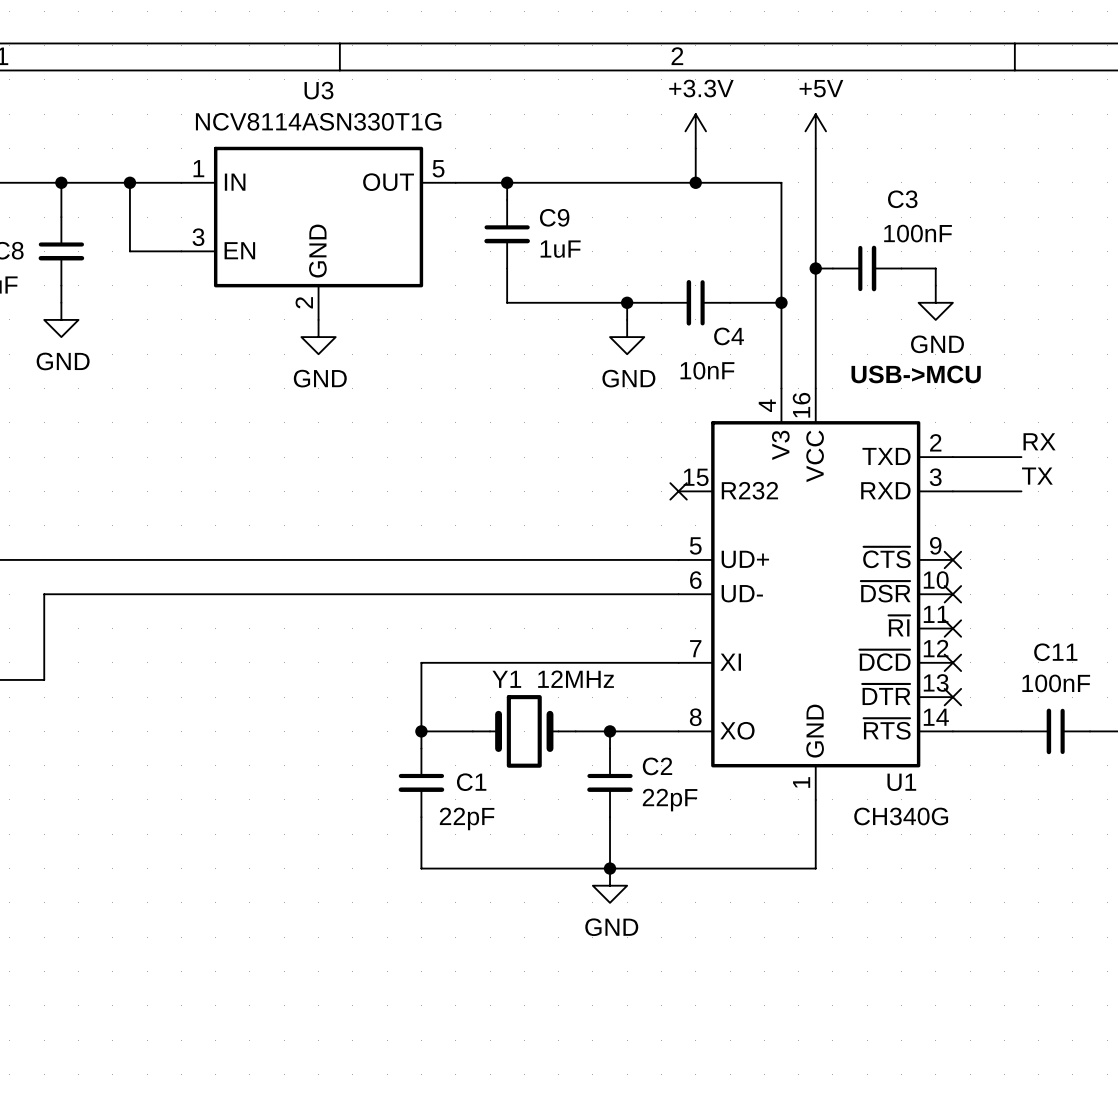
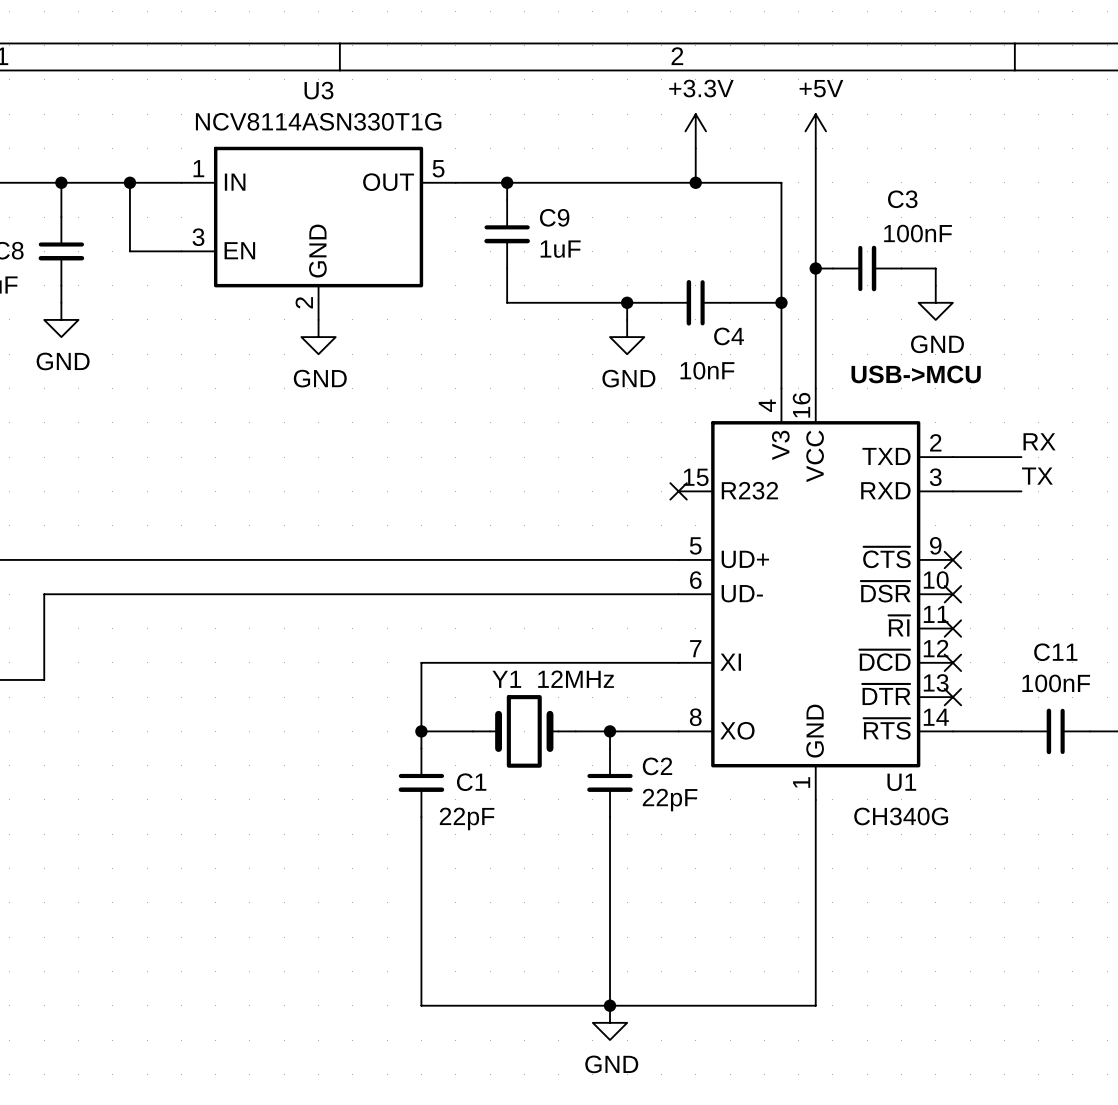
wire: (421, 868) (815, 868) -> (421, 868) (421, 1005) (815, 1005) (815, 868)
wire: none -> (610, 868) (610, 1005)
junction: (610, 868) -> none
power symbol position: GND (610, 885) -> GND (610, 1022)
junction: none -> (610, 1005)

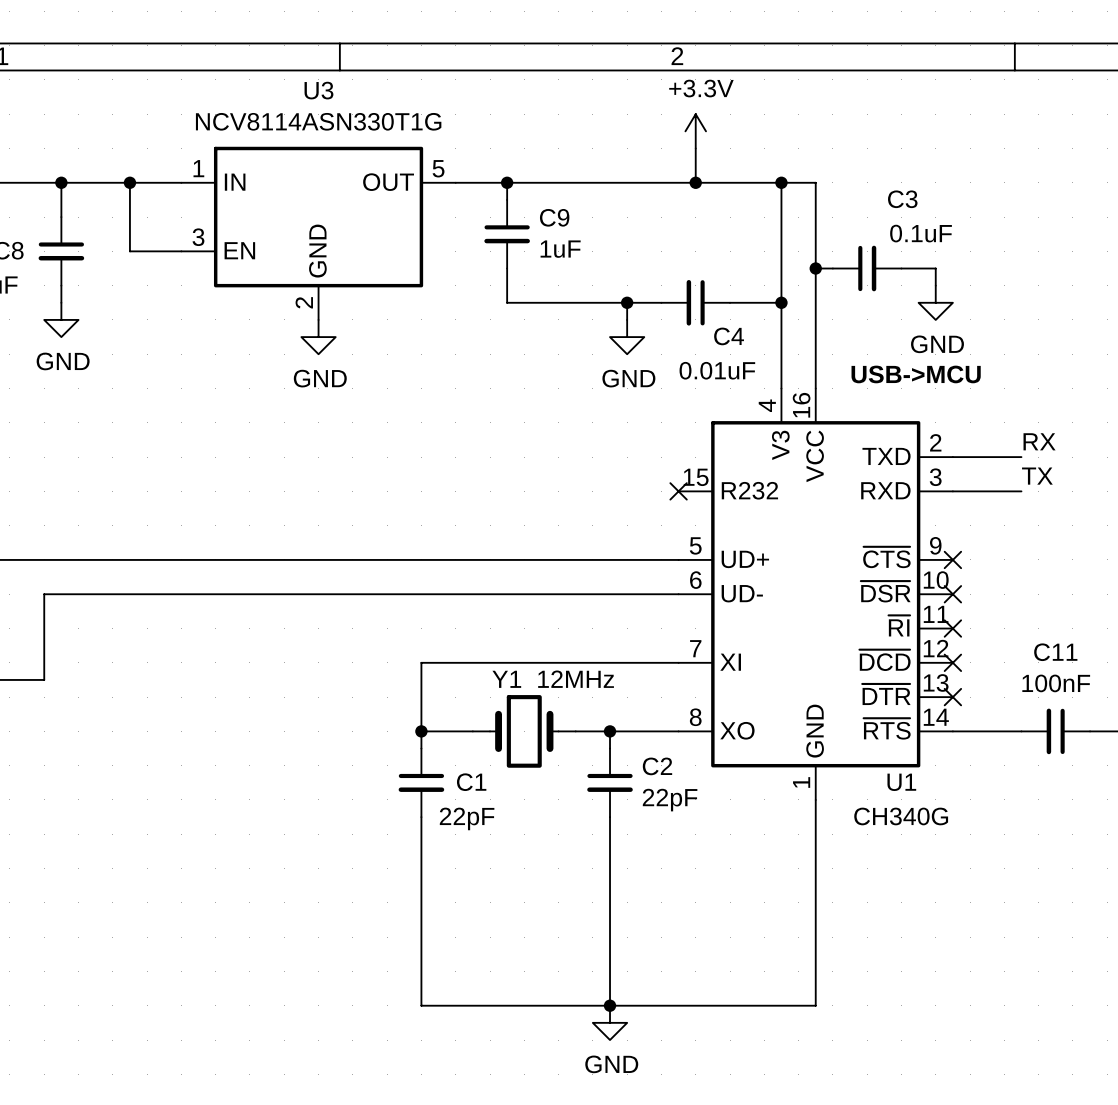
power symbol: +5V (815, 131) -> none
wire: (815, 148) (815, 182) -> (781, 182) (815, 182)
junction: none -> (781, 182)
C3 value: 100nF (918, 233) -> 0.1uF (921, 233)
C4 value: 10nF (707, 370) -> 0.01uF (717, 370)

